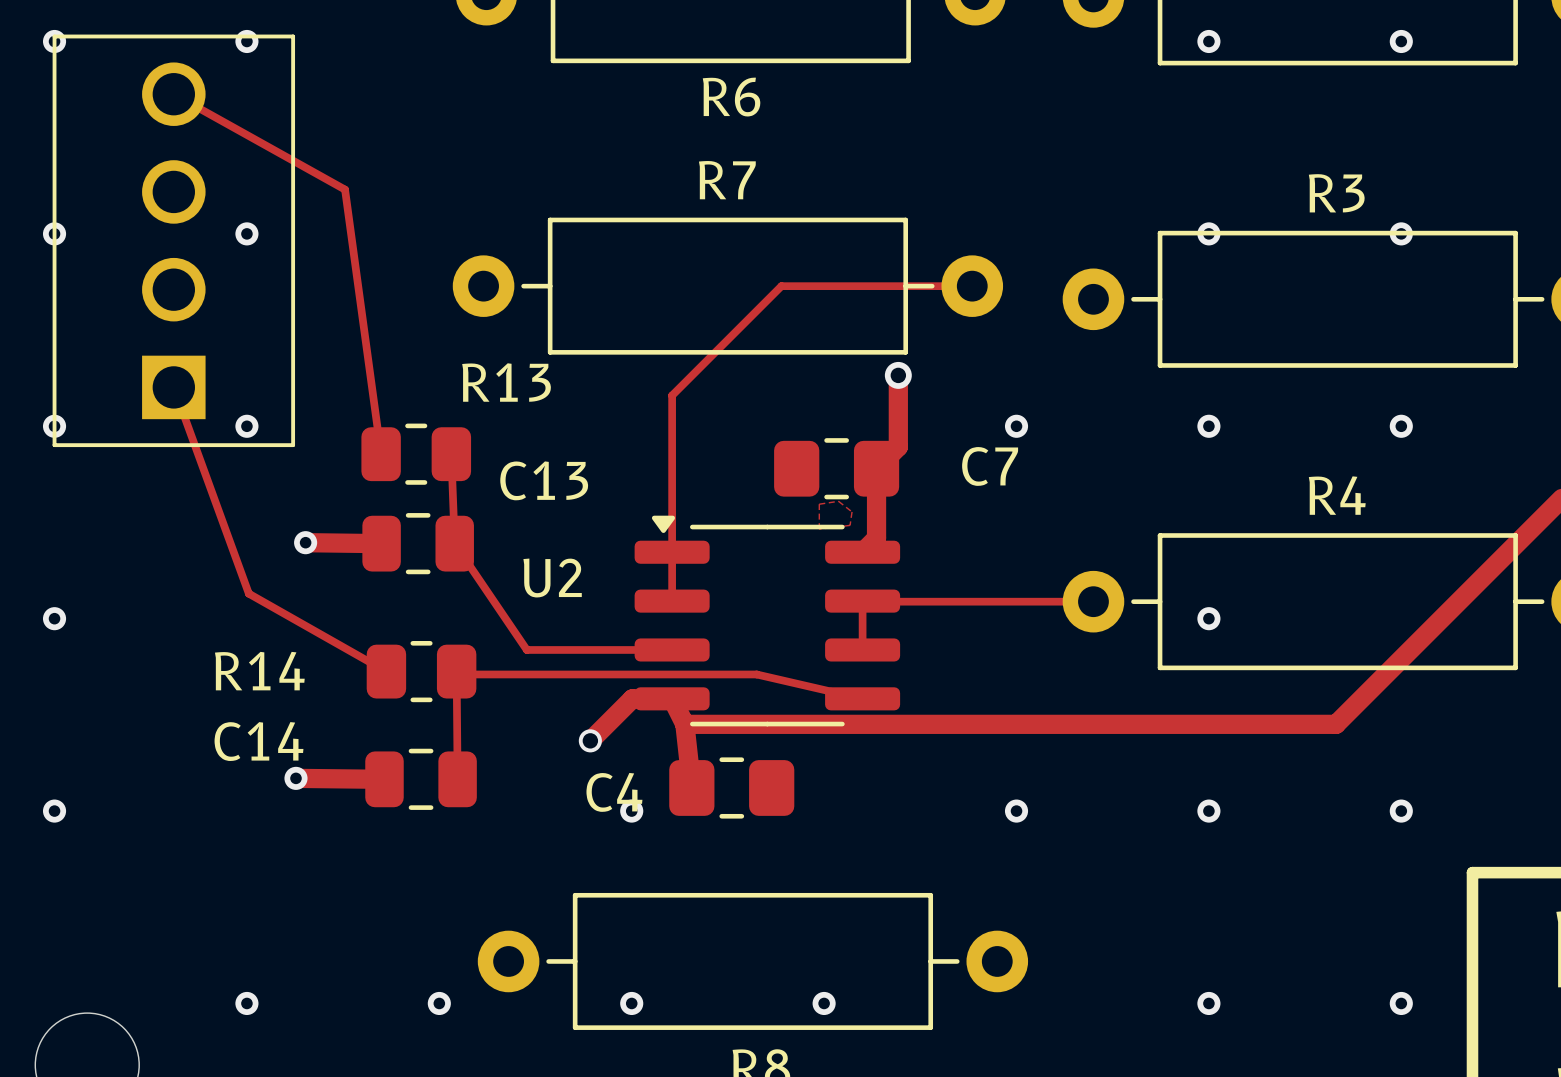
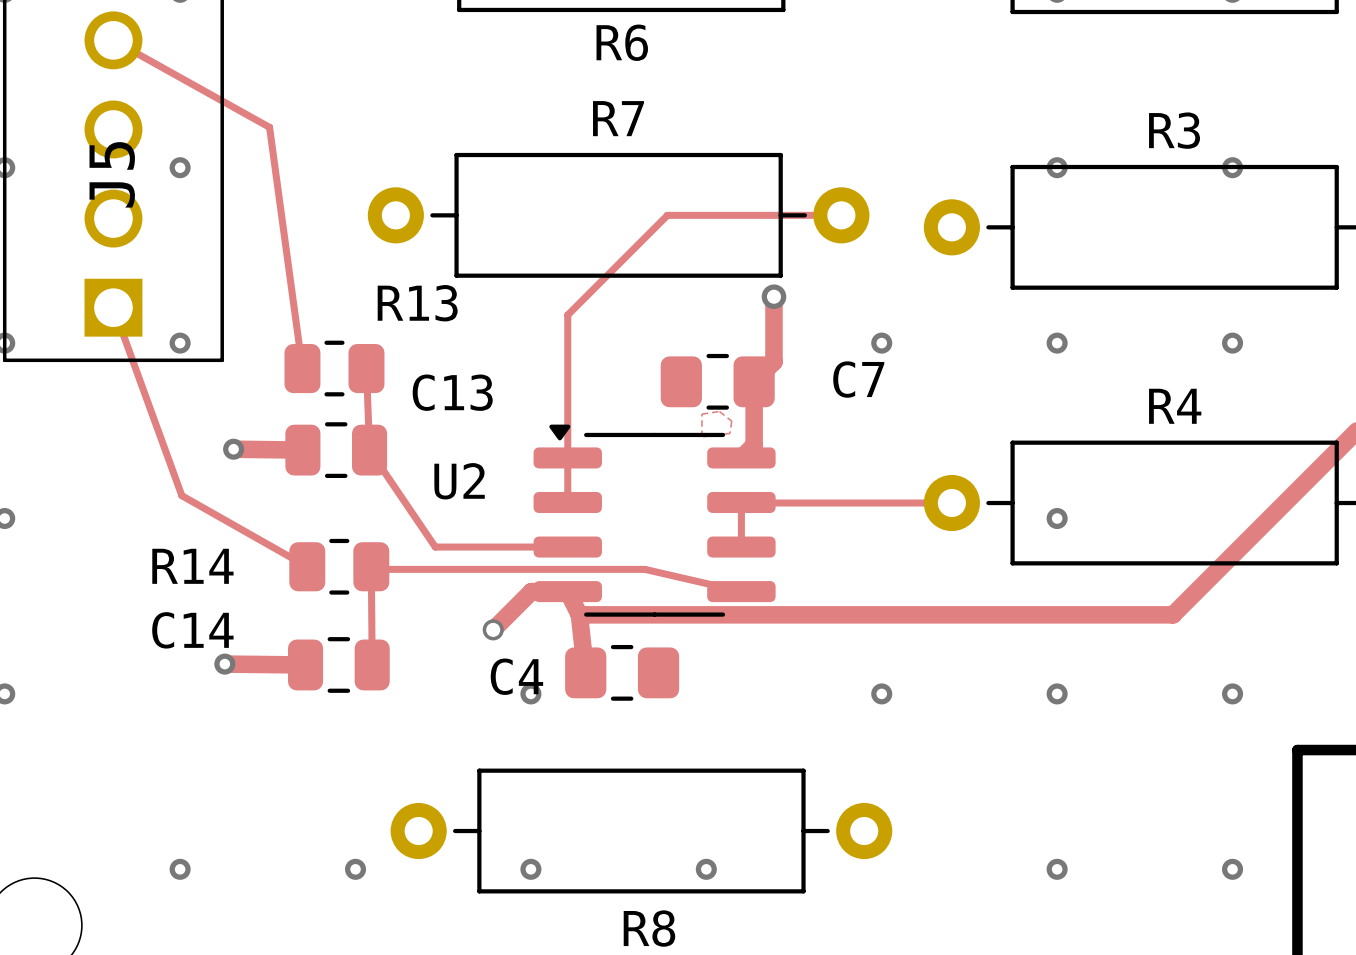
J5 name: none -> J5 (112, 174)

